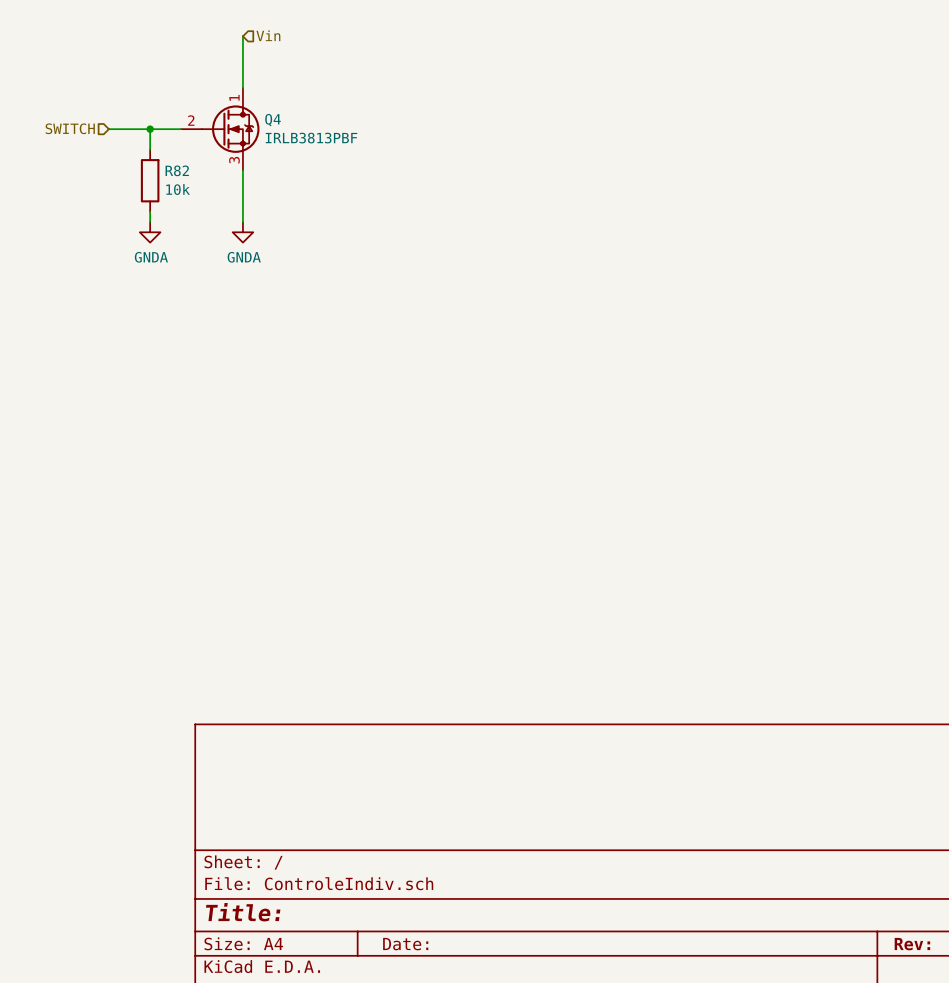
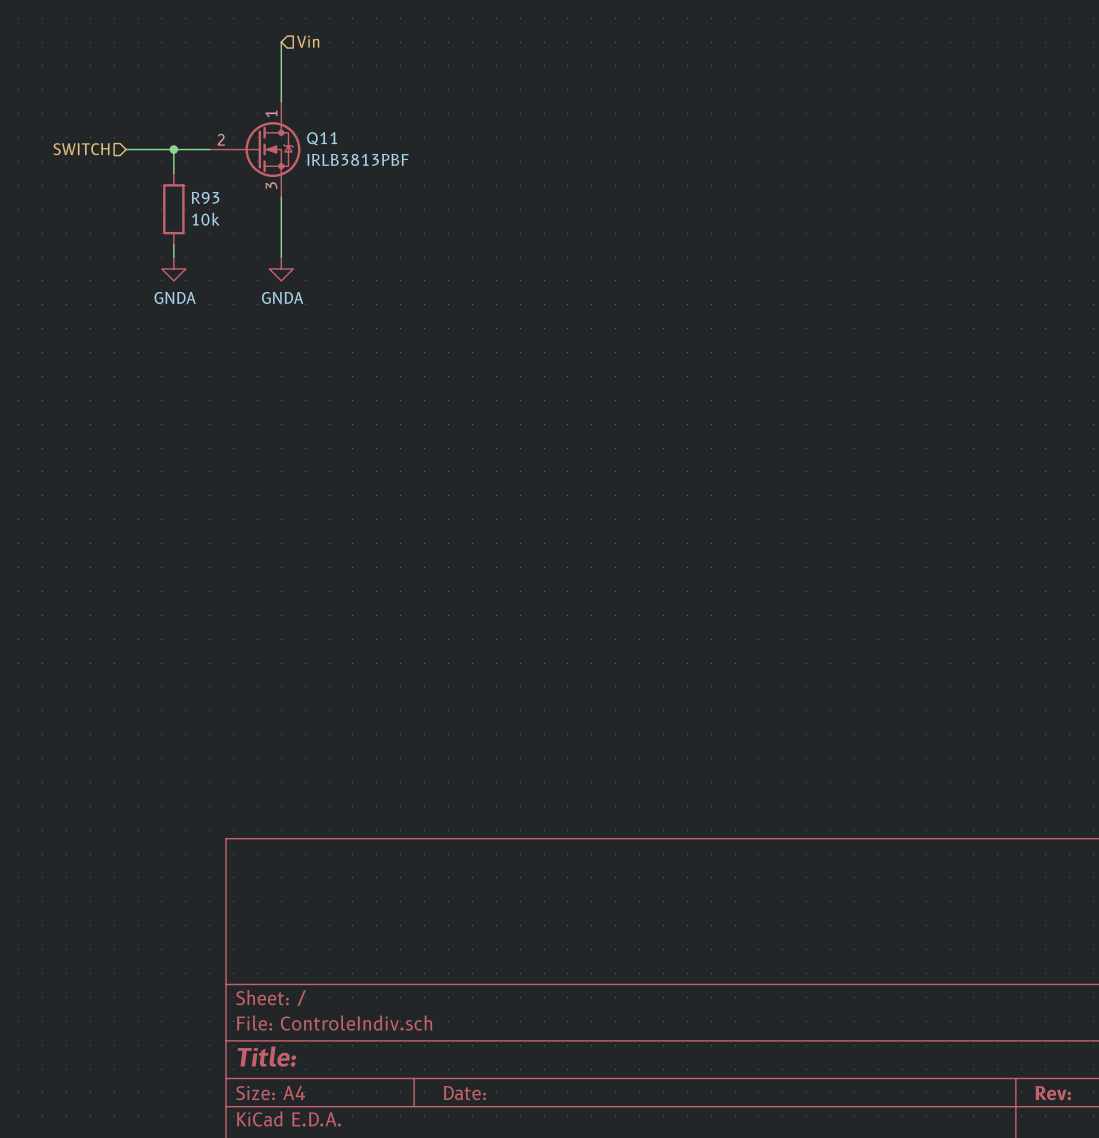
Q4 name: Q4 (273, 120) -> Q11 (322, 138)
R82 name: R82 (177, 170) -> R93 (205, 197)

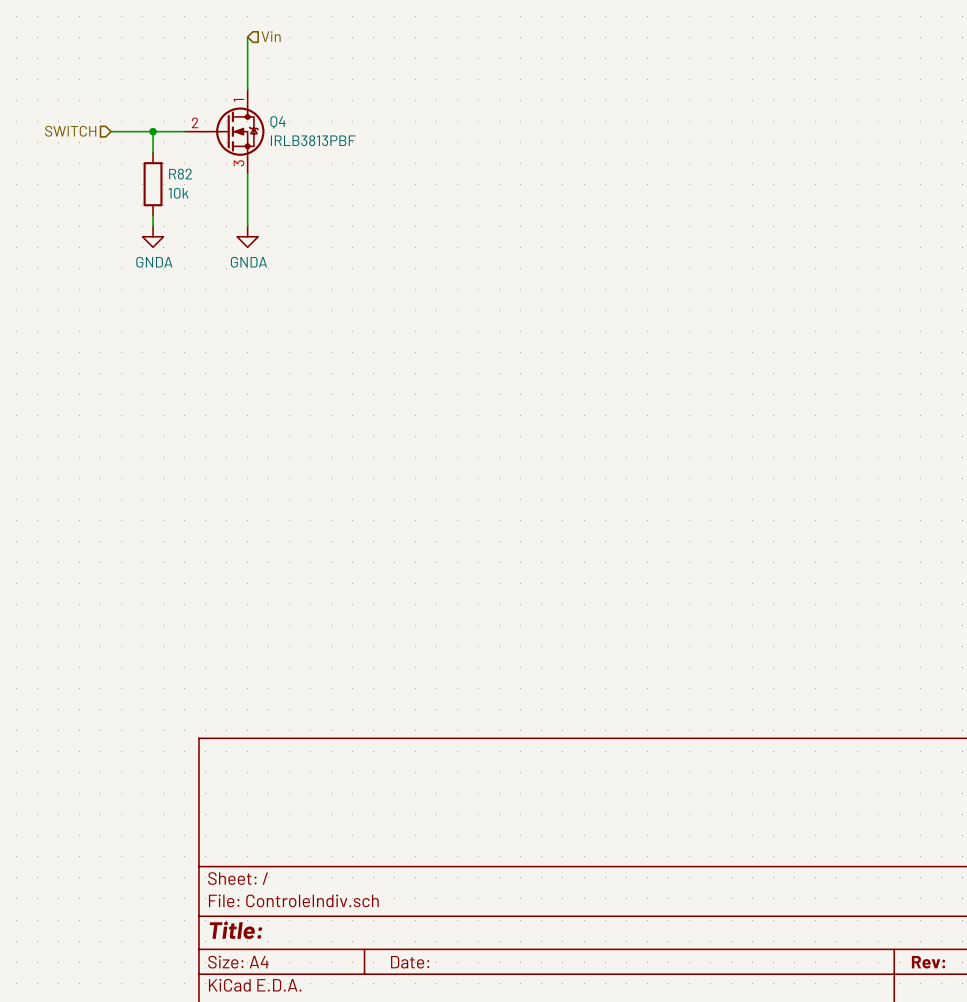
Q11 name: Q11 (322, 138) -> Q4 (277, 122)
R93 name: R93 (205, 197) -> R82 (180, 174)

